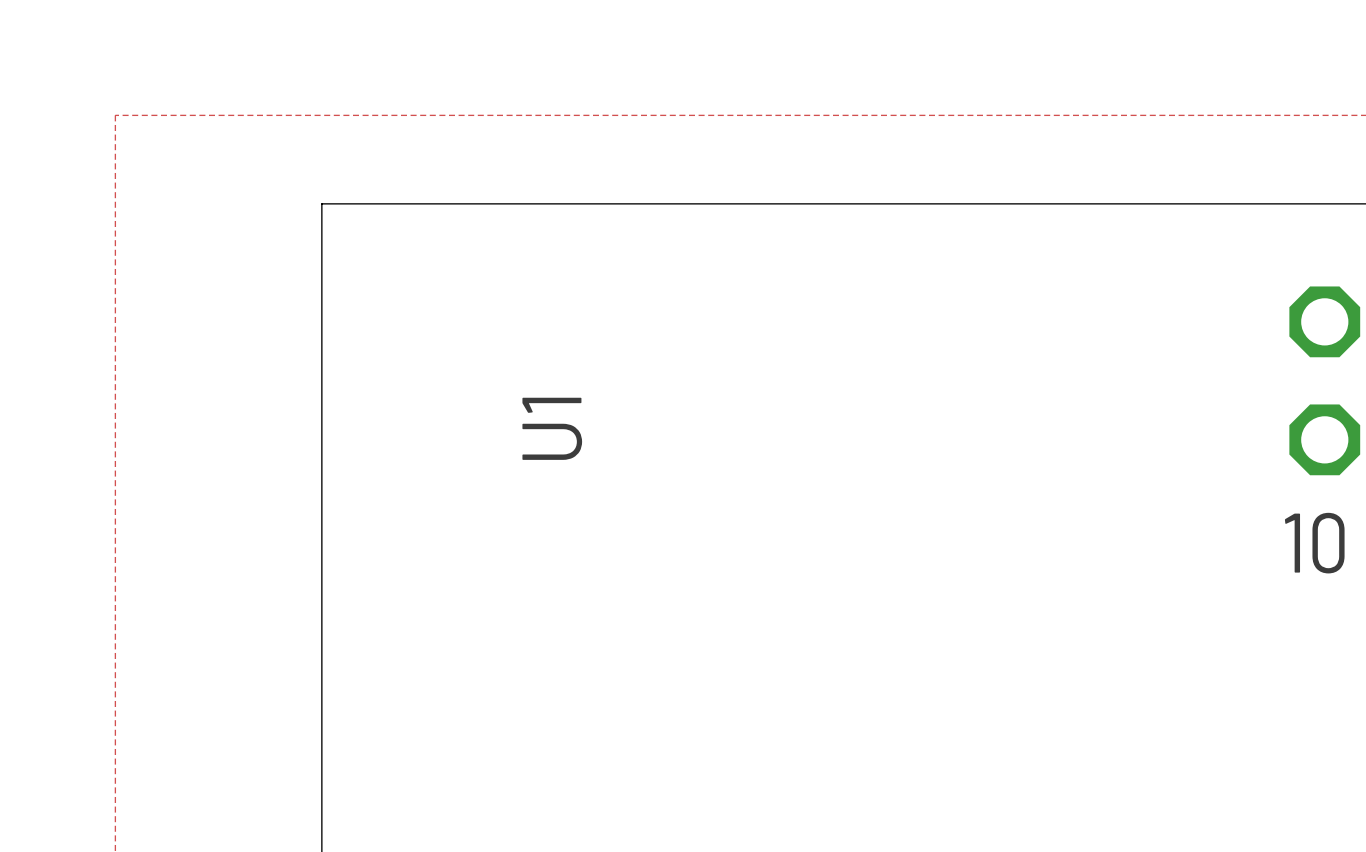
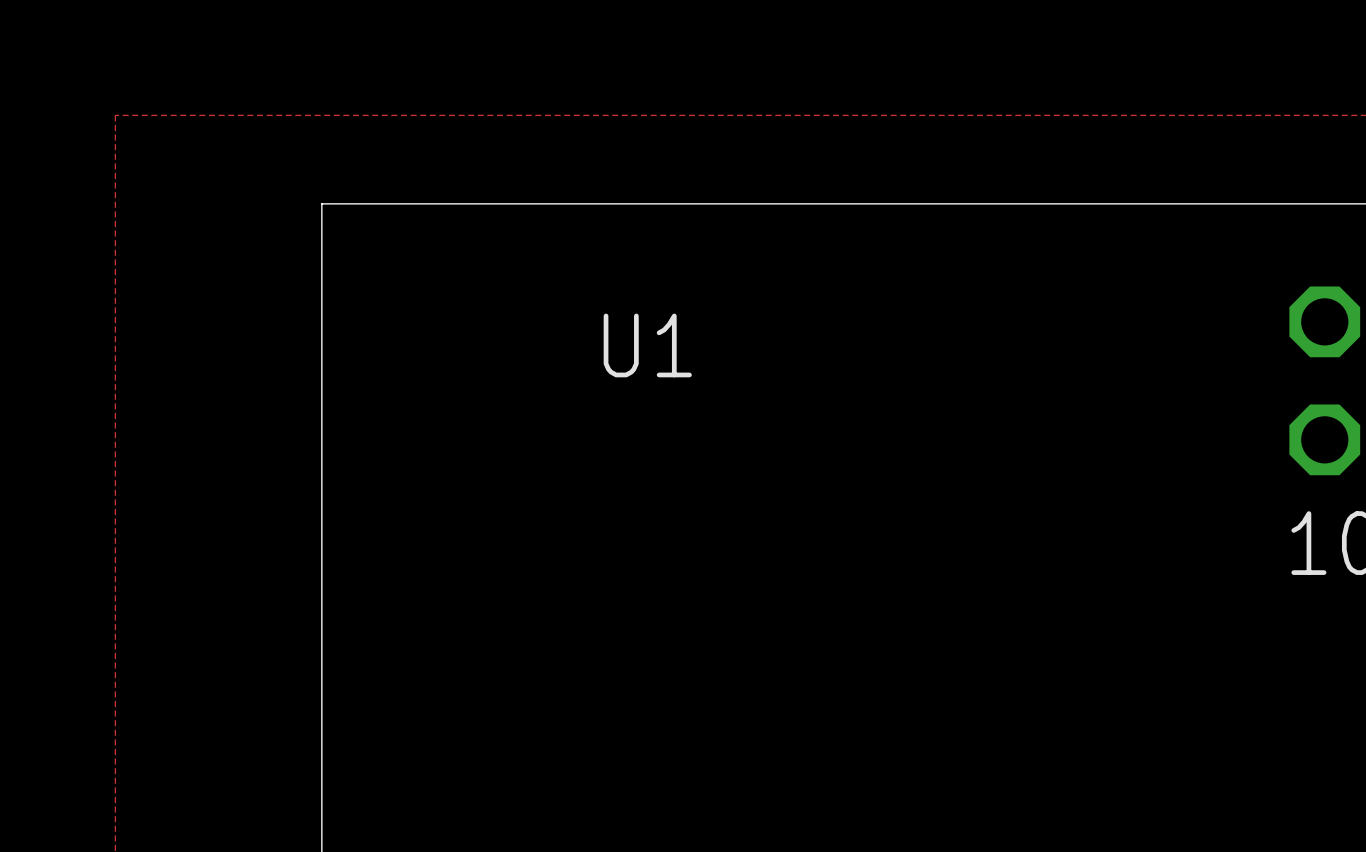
U1 name rotation: 0° (552, 428) -> 90° clockwise (647, 345)

